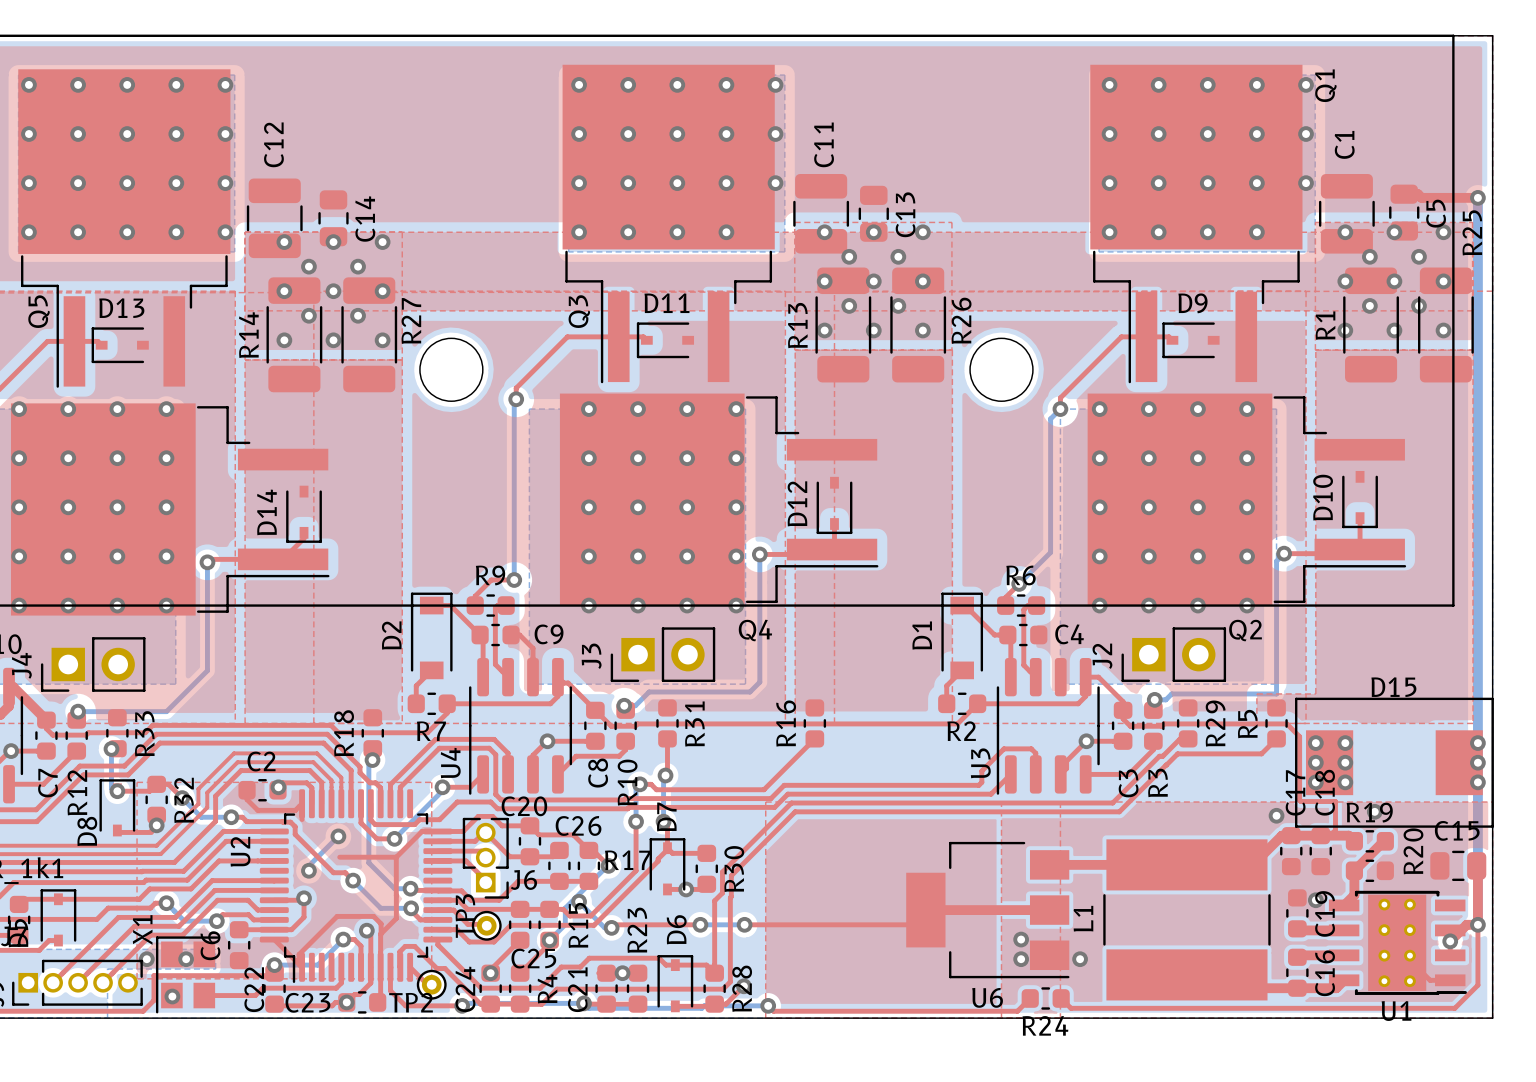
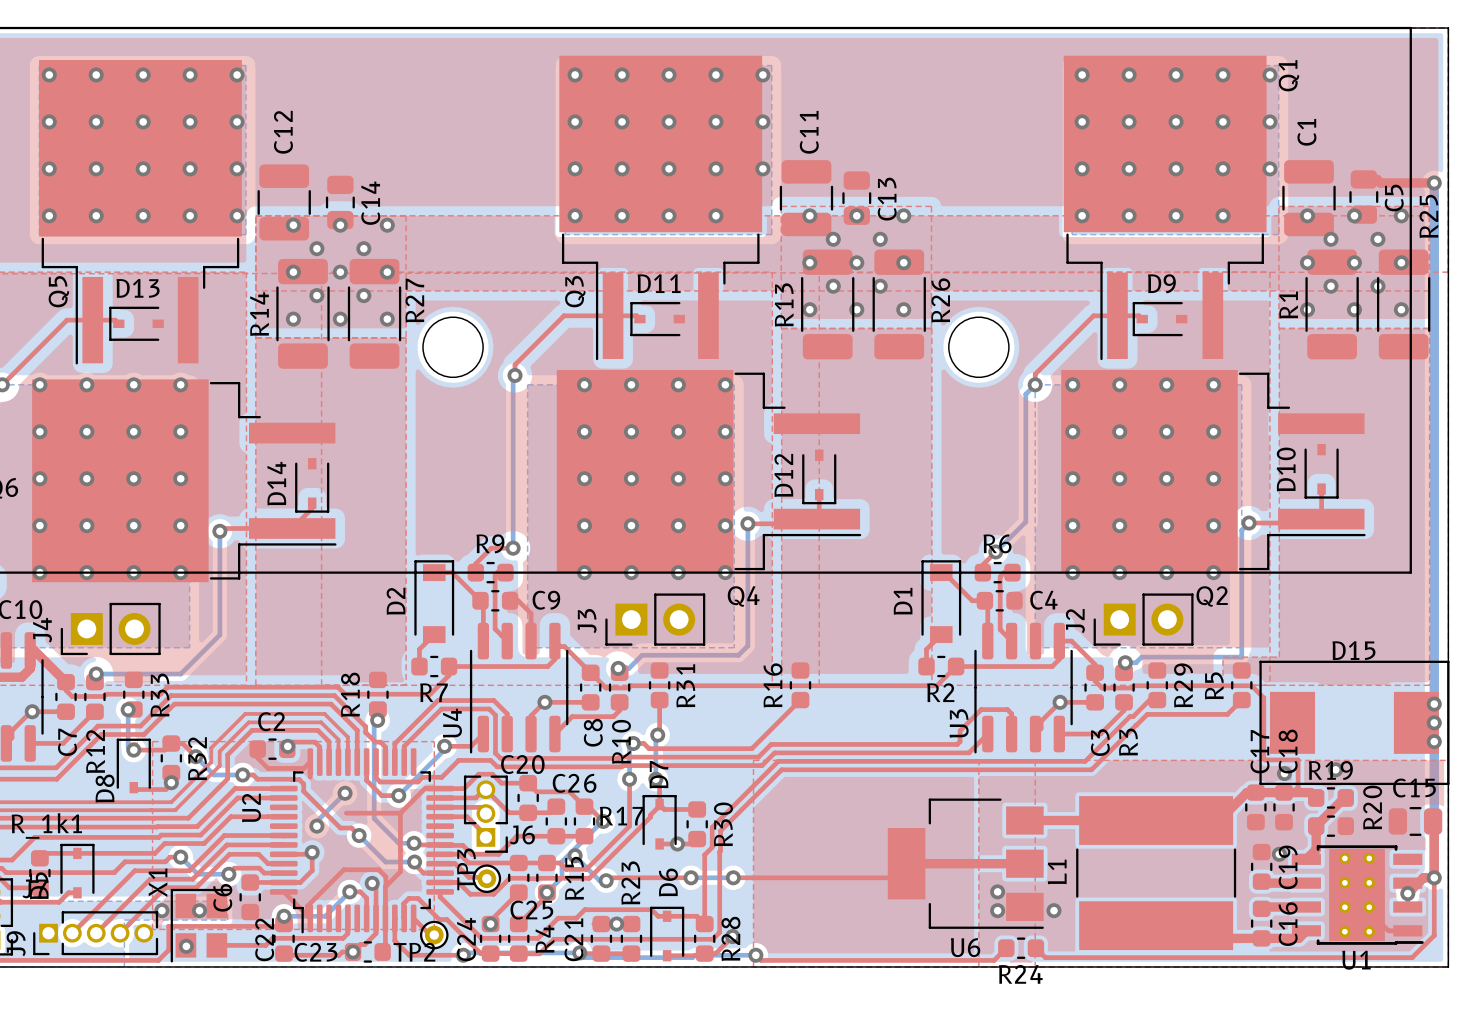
via: (1315, 743) -> none
via: (1345, 743) -> none
via: (1315, 762) -> none
via: (1345, 762) -> none
via: (1315, 782) -> none
via: (1345, 782) -> none
via: (1276, 815) -> none
via: none -> (1284, 773)

